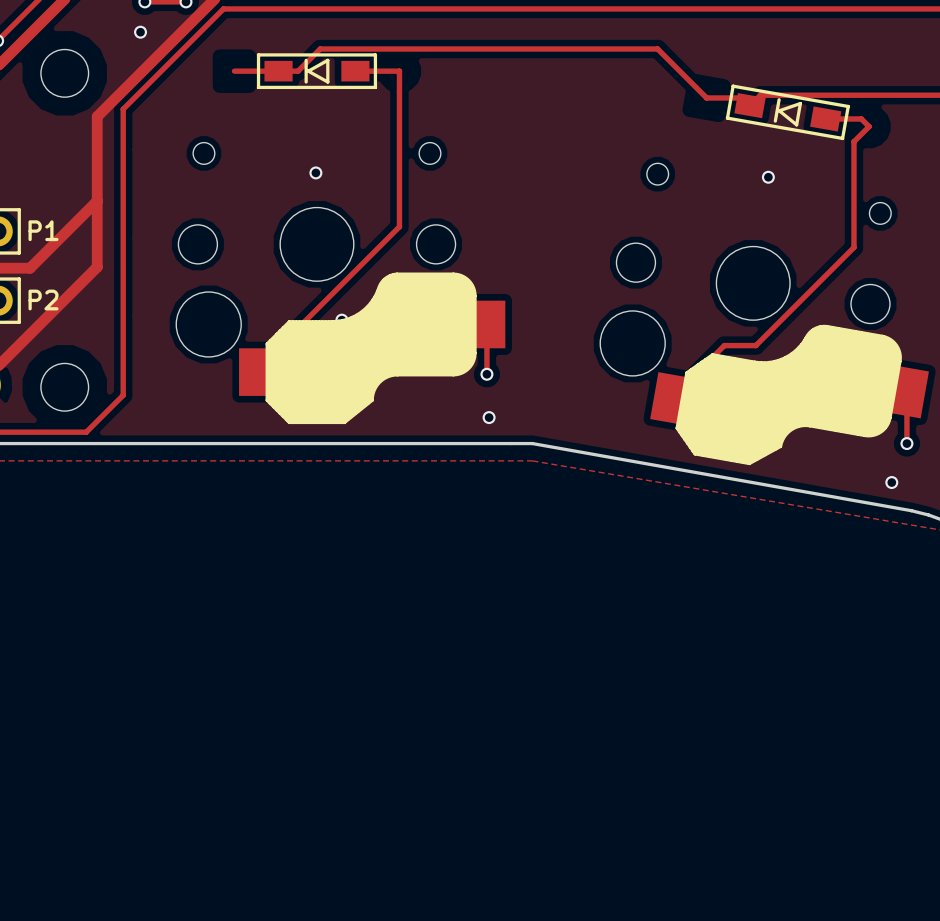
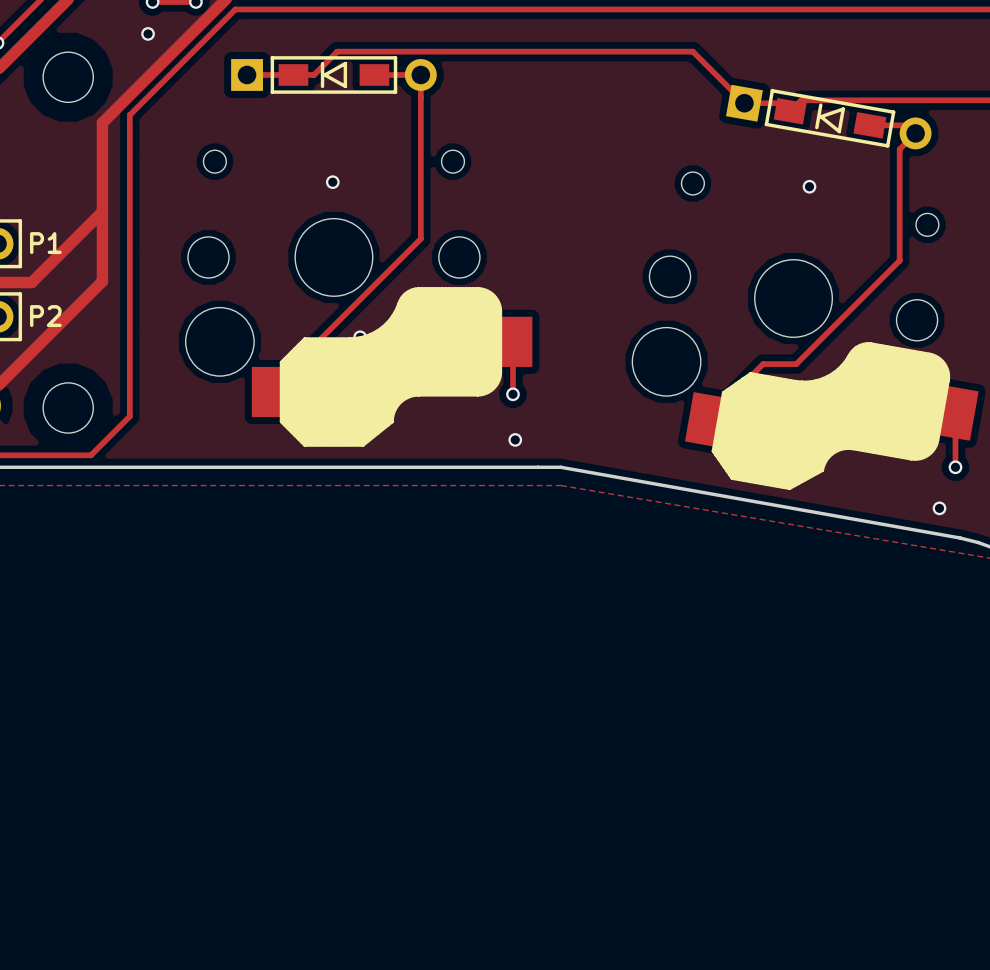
part footprint: [256, 53, 378, 90] -> [231, 56, 437, 94]
part footprint: [725, 84, 850, 141] -> [725, 84, 932, 150]

